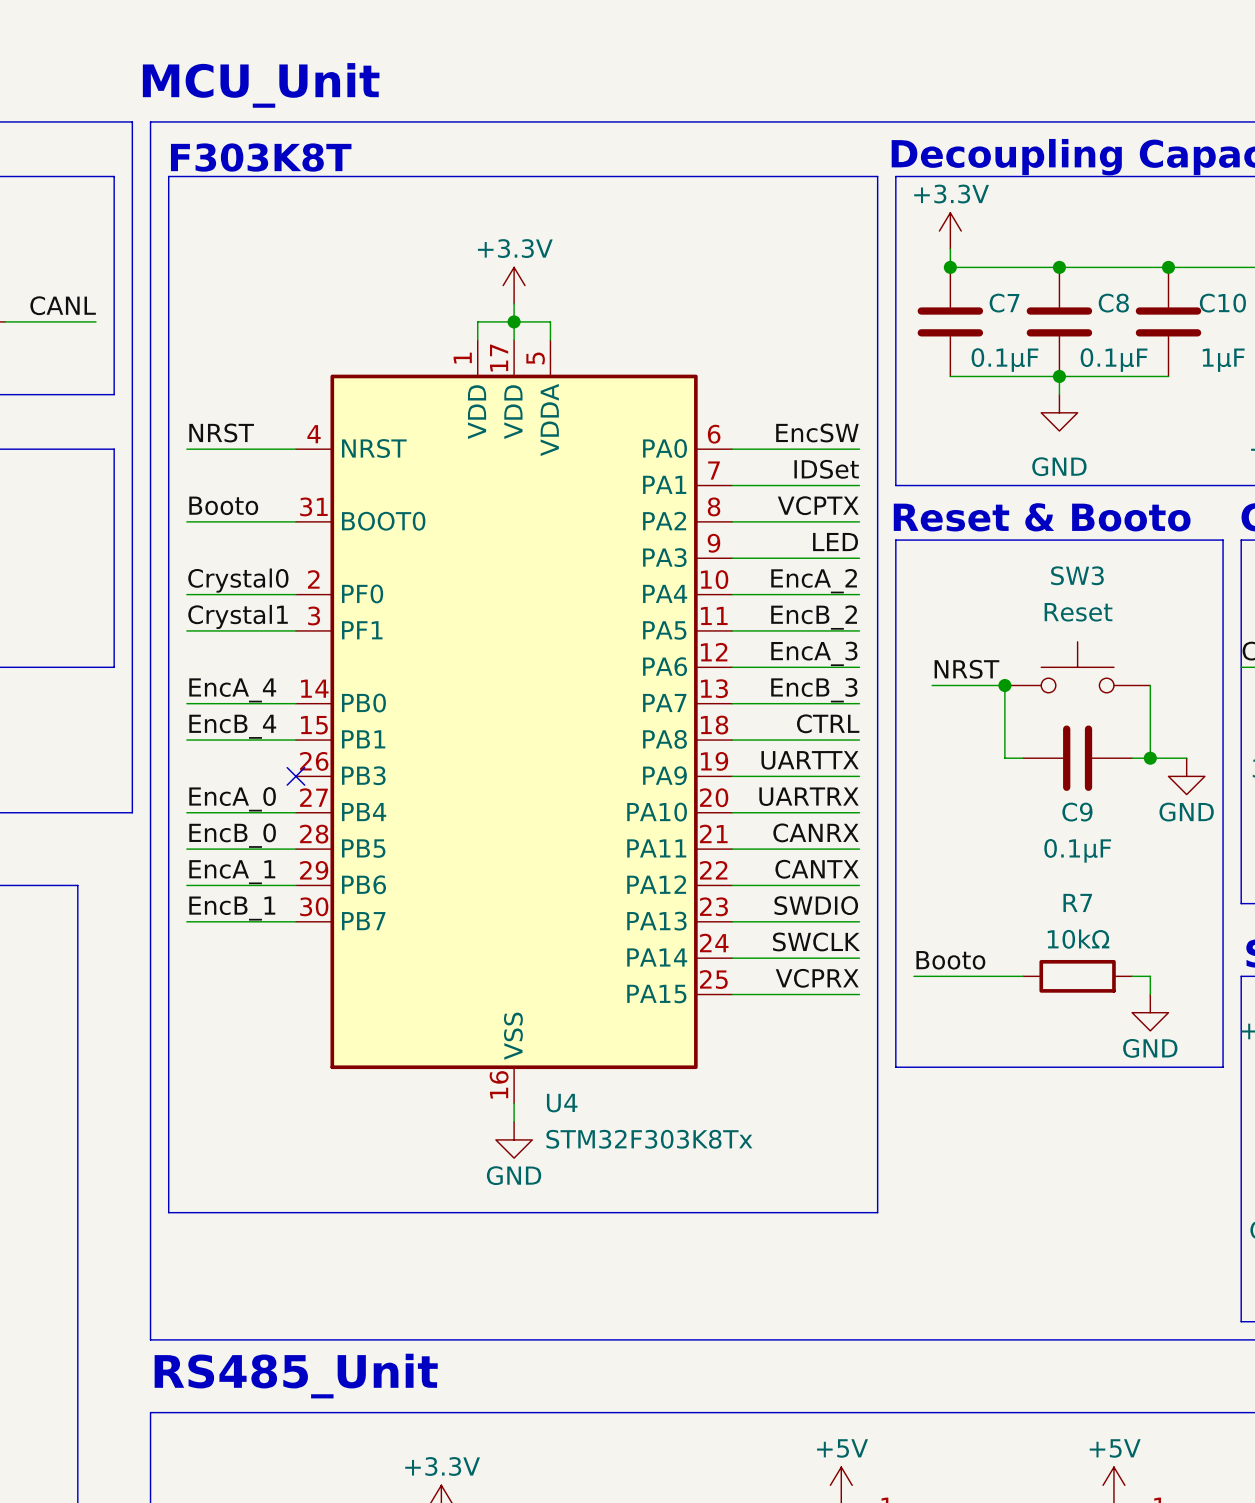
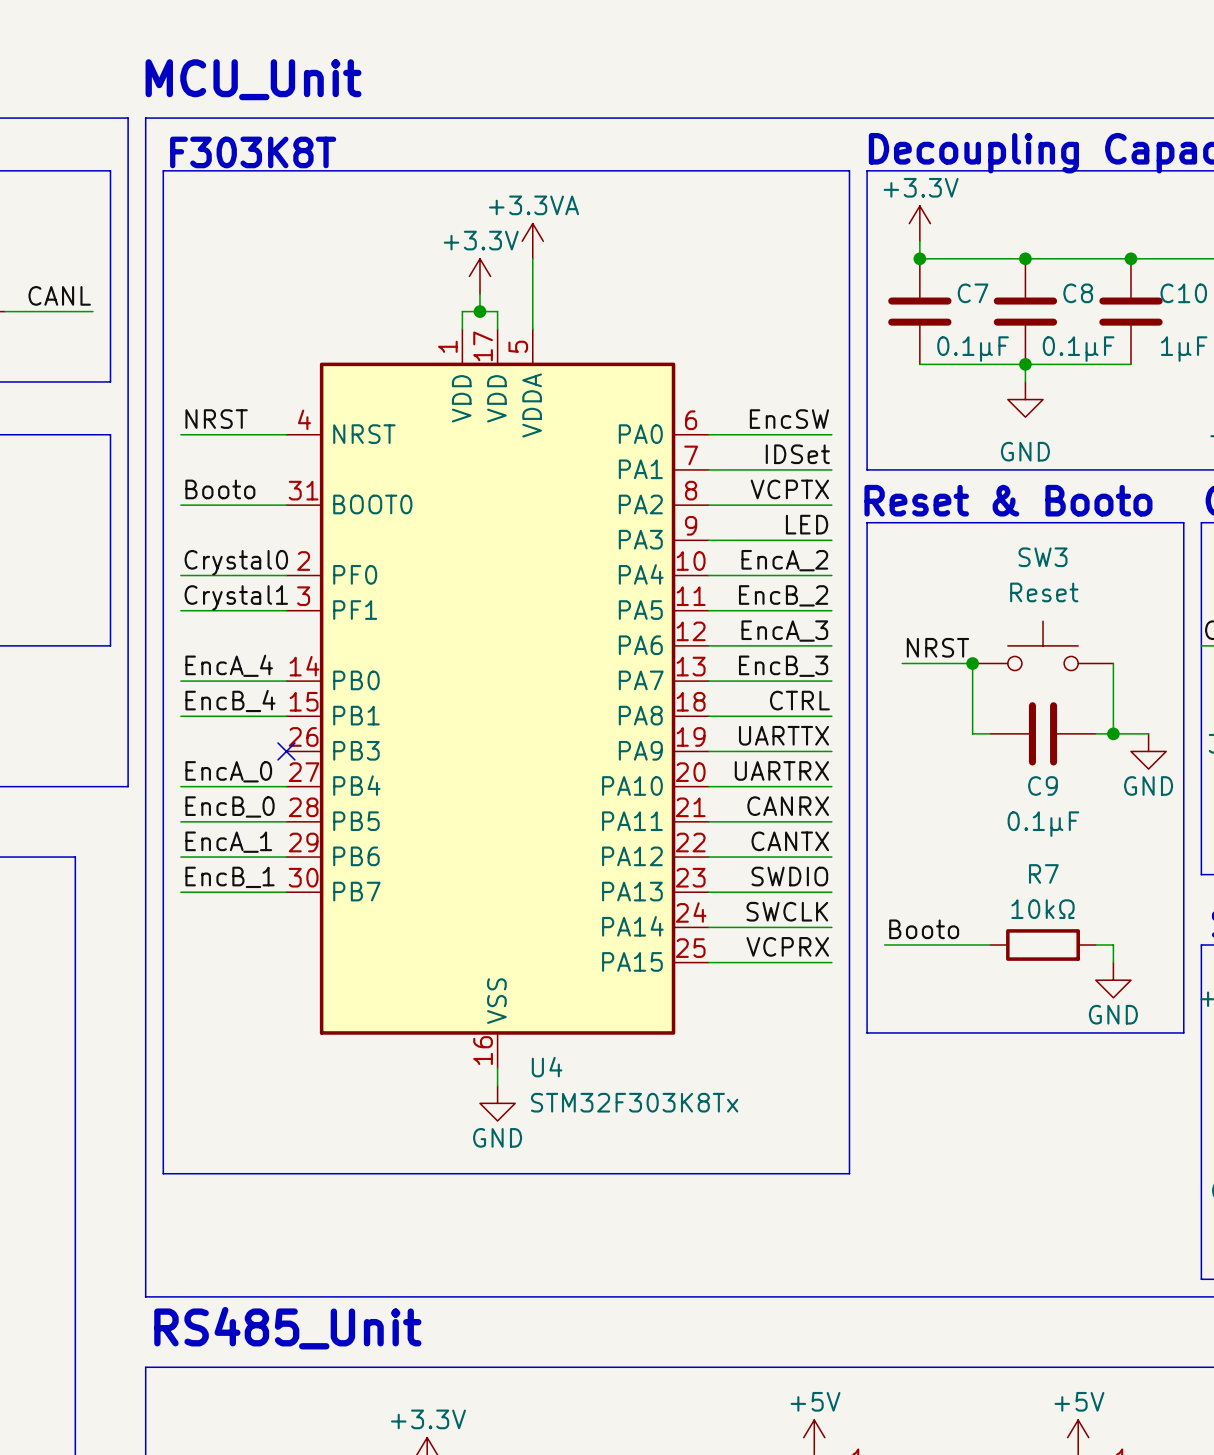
power symbol: none -> +3.3VA (532, 241)
power symbol position: +3.3V (514, 285) -> +3.3V (479, 276)
wire: none -> (479, 294) (479, 311)
wire: (514, 303) (514, 321) (550, 321) -> (532, 258) (532, 311)
junction position: (514, 321) -> (479, 311)

